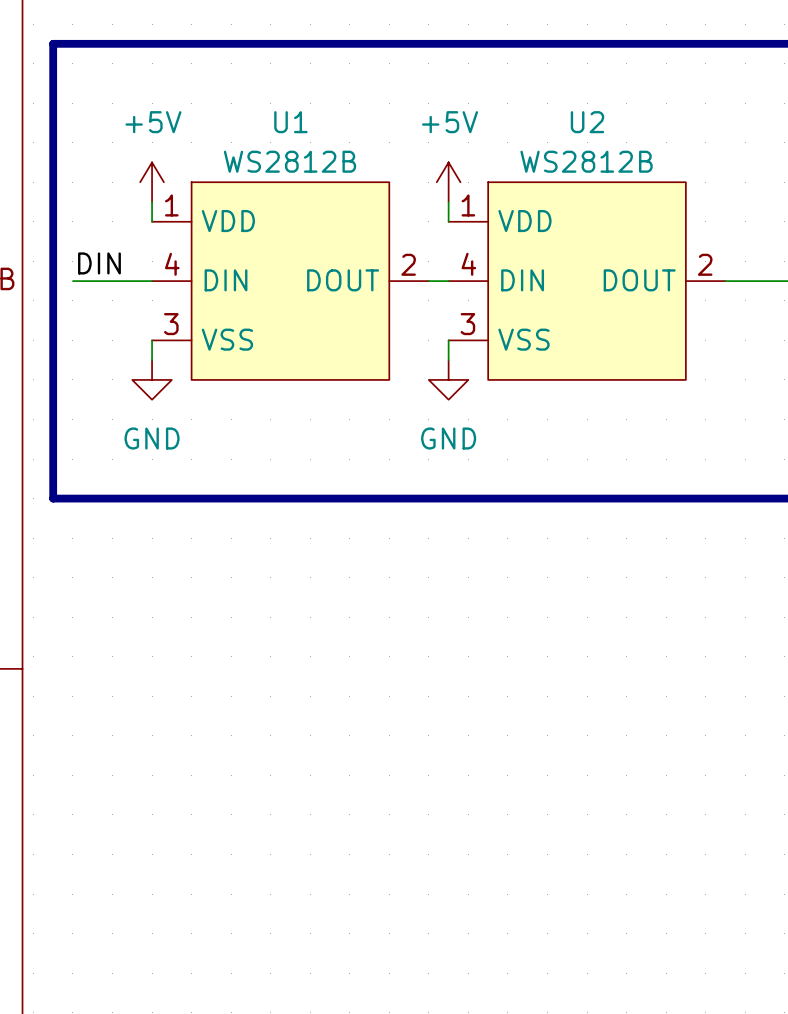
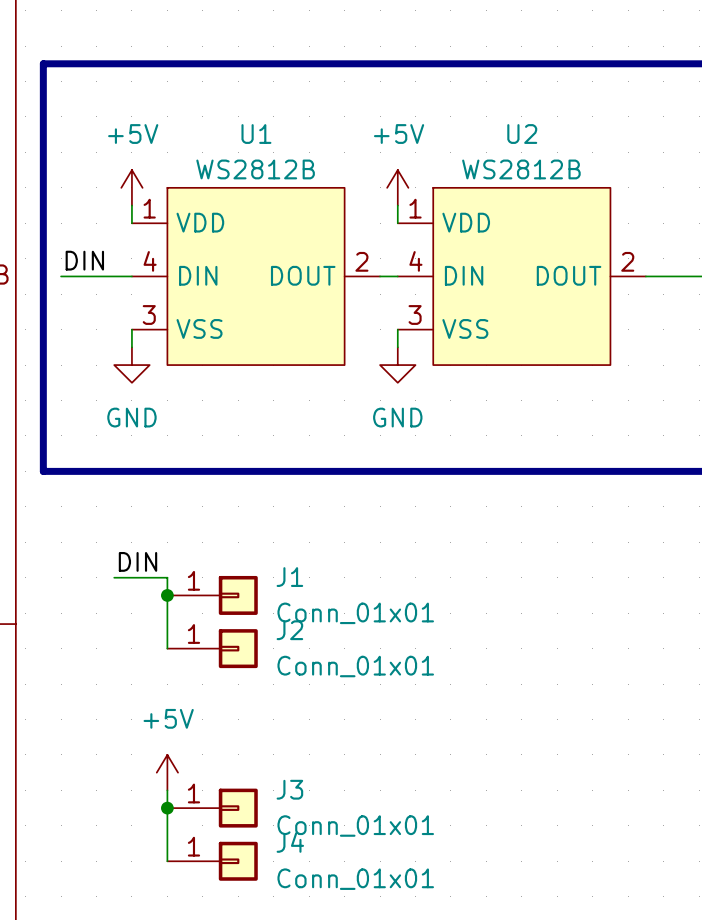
label: none -> DIN (138, 561)
wire: none -> (114, 577) (167, 577) (167, 648)
junction: none -> (167, 595)
J1: none -> Conn_01x01 (212, 595)
J2: none -> Conn_01x01 (212, 648)
power symbol: none -> +5V (167, 772)
wire: none -> (167, 790) (167, 861)
junction: none -> (167, 808)
J3: none -> Conn_01x01 (212, 808)
J4: none -> Conn_01x01 (212, 861)

